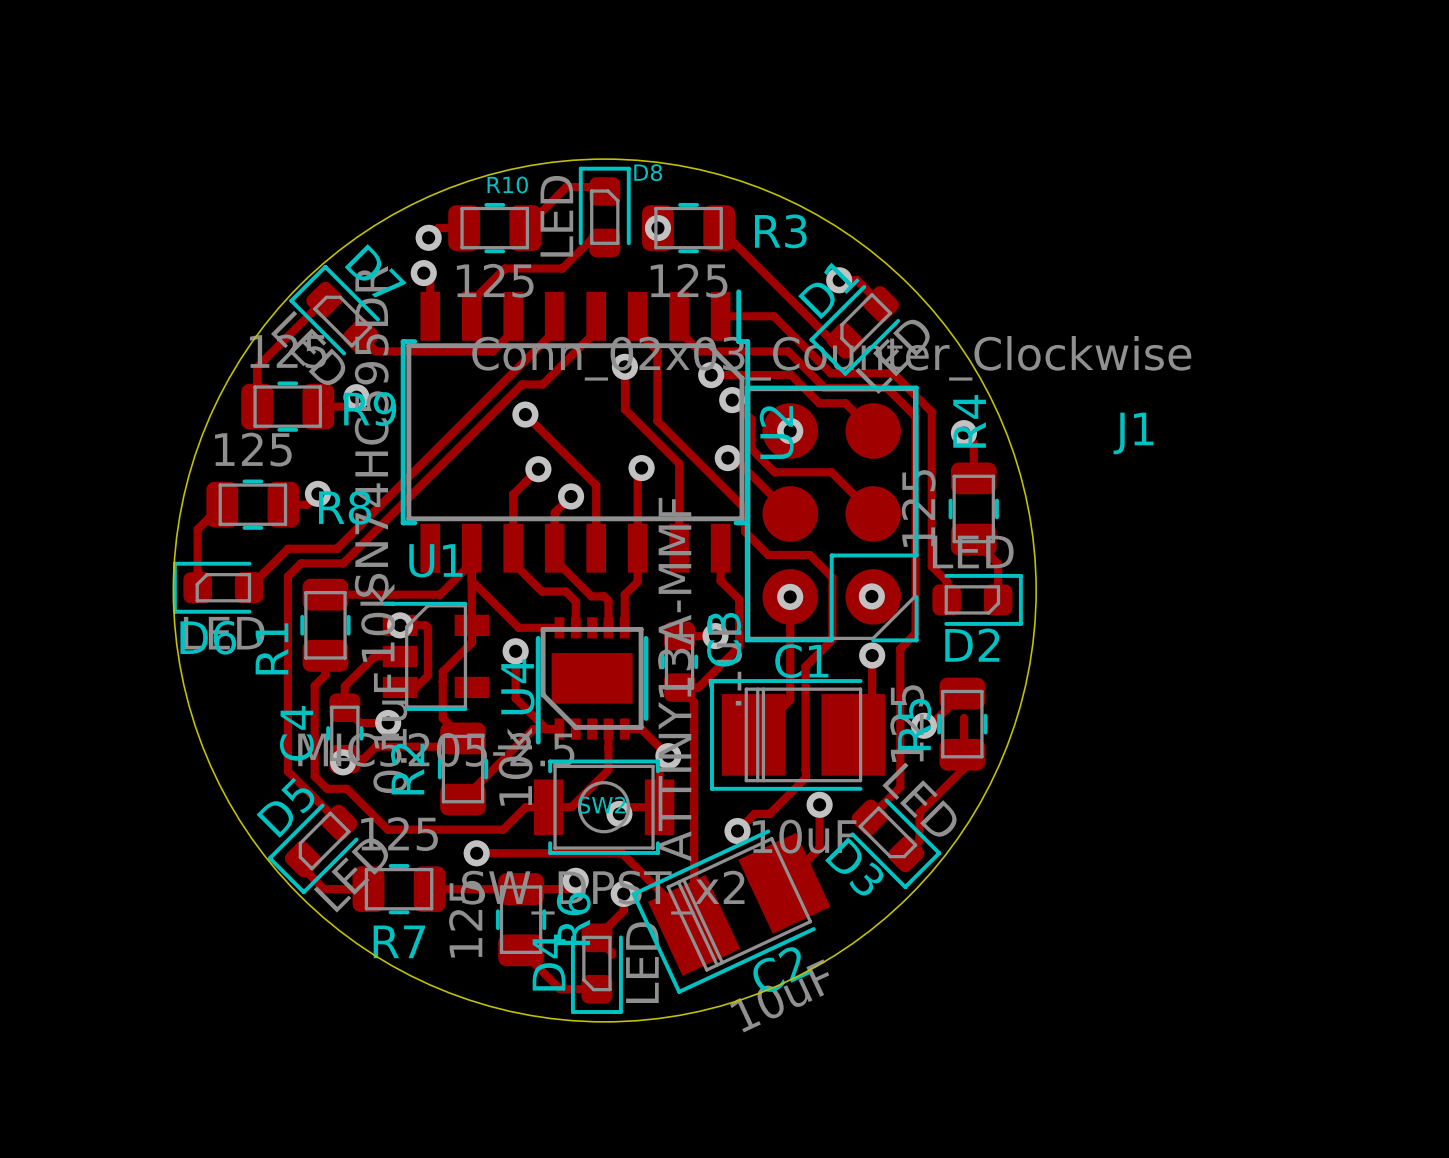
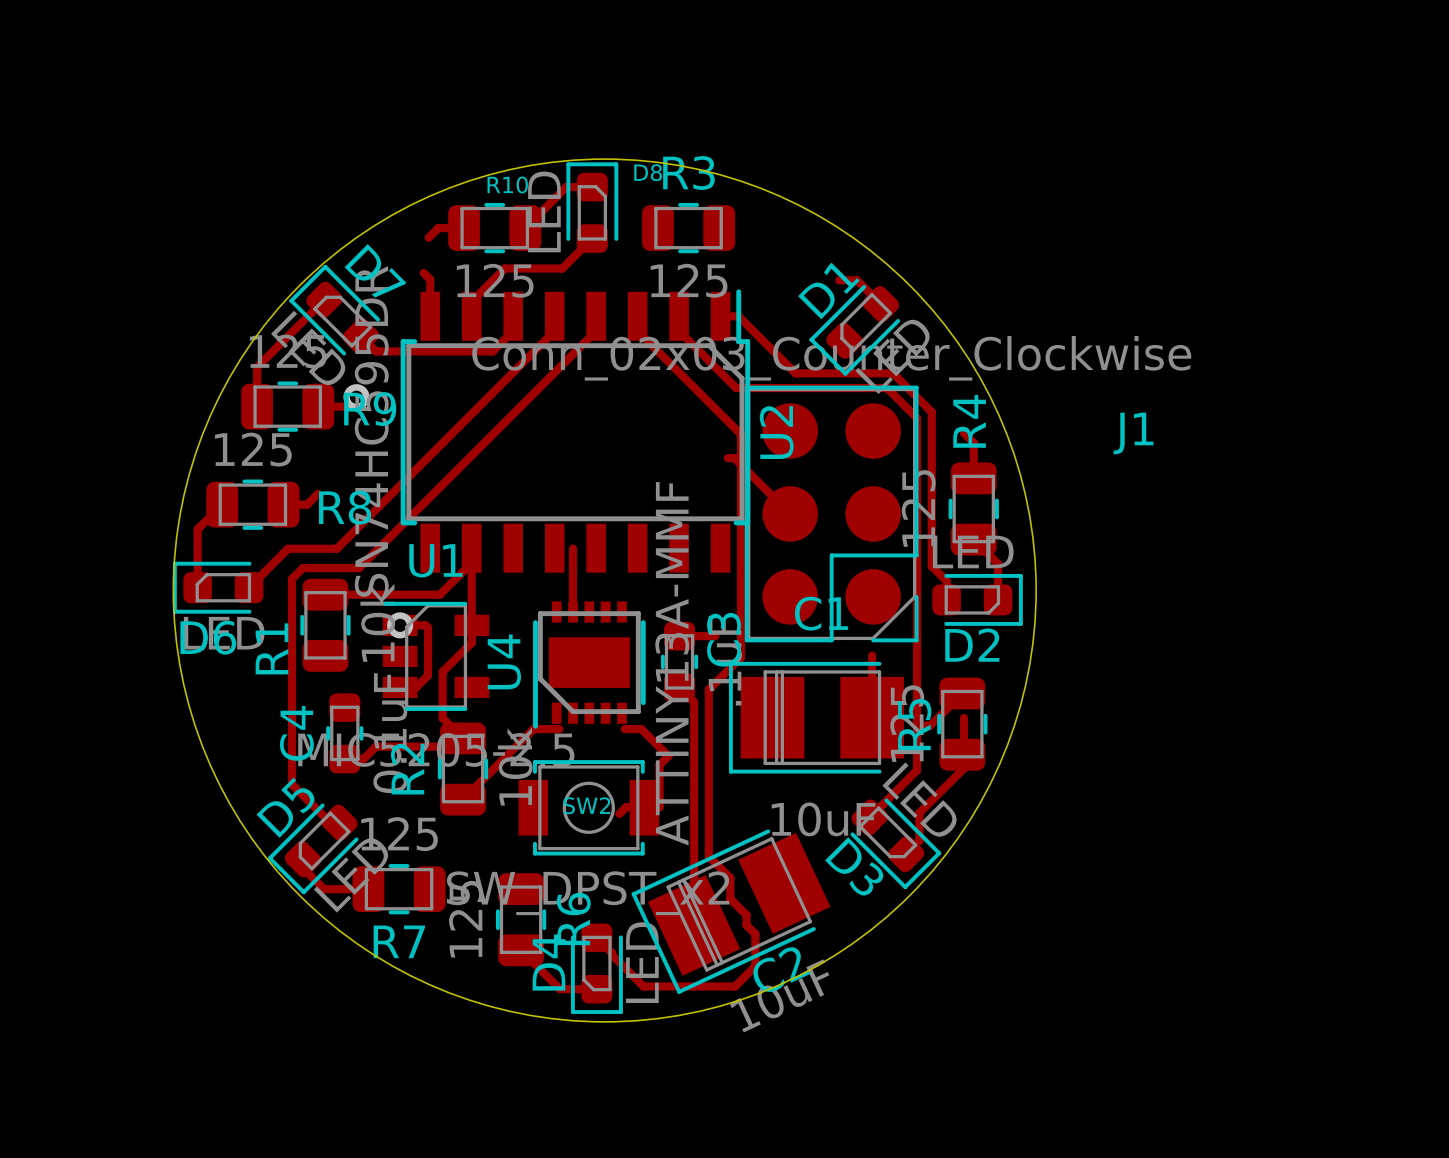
D8 position: (604, 211) -> (592, 207)
via: (657, 228) -> none
track: (719, 228) (831, 340) (844, 340) -> none
R3 name position: R3 (780, 231) -> R3 (688, 173)
via: (428, 237) -> none
via: (423, 273) -> none
via: (839, 280) -> none
track: (738, 316) (773, 316) (830, 373) -> (738, 316) (795, 373) (830, 373)
track: (657, 350) (657, 421) (745, 508) (745, 531) (768, 554) (809, 554) (832, 577) (832, 639) (805, 666) (805, 770) -> (657, 350) (741, 434) (741, 657) (708, 689) (708, 856) (730, 878) (730, 898) (746, 915) (746, 925) (755, 934) (755, 966) (735, 986) (643, 986) (611, 954)
track: (699, 351) (788, 351) (824, 388) -> (699, 351) (736, 388) (824, 388)
track: (624, 366) (624, 409) (679, 463) (679, 548) -> none
via: (624, 366) -> none
track: (711, 375) (791, 375) (819, 403) (845, 403) (873, 431) -> none
via: (711, 375) -> none
track: (542, 384) (522, 384) (343, 563) (300, 563) (287, 576) (287, 771) (339, 822) -> (542, 384) (359, 568) (302, 568) (291, 579) (291, 784) (331, 824)
track: (732, 400) (751, 419) (751, 449) (774, 472) (831, 472) (873, 513) -> none
via: (732, 400) -> none
track: (525, 414) (596, 485) (596, 548) -> none
via: (525, 414) -> none
track: (915, 416) (915, 633) (900, 648) (900, 787) -> (915, 416) (917, 770) (900, 787)
via: (790, 431) -> none
via: (963, 433) -> none
via: (727, 458) -> none
track: (641, 468) (637, 472) (637, 581) (624, 594) (624, 627) -> none
via: (641, 468) -> none
track: (538, 469) (513, 494) (513, 562) (541, 591) (565, 591) (575, 601) (575, 619) -> none
via: (538, 469) -> none
via: (317, 493) -> none
track: (571, 496) (554, 512) (554, 559) (591, 596) (604, 596) (608, 600) (608, 619) -> none
via: (571, 496) -> none
track: none -> (573, 548) (573, 612)
track: (720, 548) (720, 580) (739, 599) (739, 646) (698, 687) (679, 687) -> none
track: (471, 580) (518, 627) (559, 627) -> none
track: (790, 596) (790, 700) (772, 717) -> none
via: (790, 596) -> none
via: (871, 596) -> none
via: (715, 636) -> none
track: (515, 651) (515, 698) (546, 729) -> none
via: (515, 651) -> none
track: (325, 655) (325, 675) (314, 685) (314, 776) (327, 788) (346, 788) (387, 829) (503, 829) (525, 807) (571, 807) (608, 770) (608, 729) -> none
via: (872, 655) -> none
track: (400, 656) (374, 656) (344, 686) (344, 707) (360, 722) (388, 722) -> none
C1 name position: C1 (801, 661) -> C1 (821, 613)
U4 position: (592, 680) -> (589, 665)
U4 name position: U4 (517, 686) -> U4 (504, 661)
via: (388, 722) -> none
via: (923, 725) -> none
C1 position: (797, 734) -> (816, 717)
via: (668, 756) -> none
via: (343, 762) -> none
track: (805, 770) (805, 777) (769, 813) (754, 813) (737, 831) -> none
track: (819, 804) (819, 848) (784, 883) -> none
via: (819, 804) -> none
SW2 position: (604, 807) -> (588, 807)
via: (619, 813) -> none
via: (737, 831) -> none
track: (476, 853) (622, 853) (694, 925) -> none
via: (476, 853) -> none
via: (575, 880) -> none
track: (623, 893) (623, 910) (596, 937) -> none
via: (623, 893) -> none

